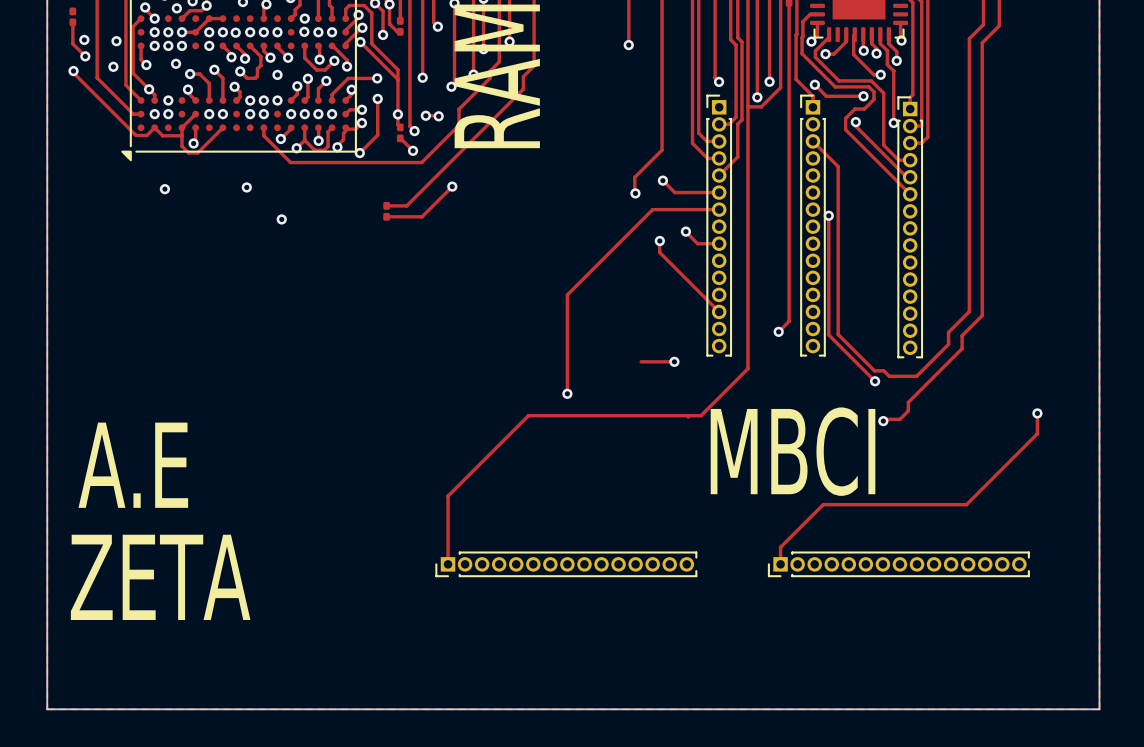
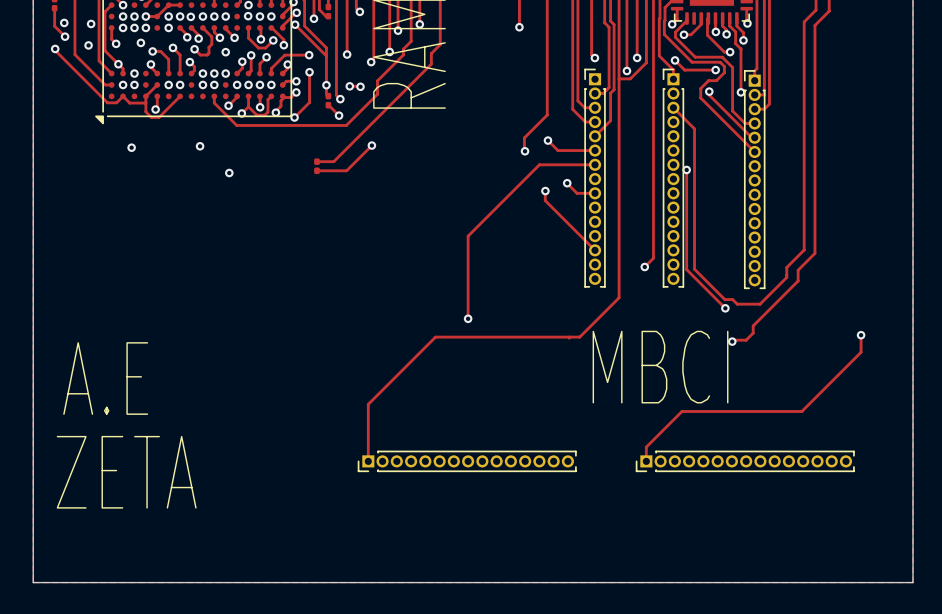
track: (641, 361) (674, 361) -> none
via: (674, 361) -> none

